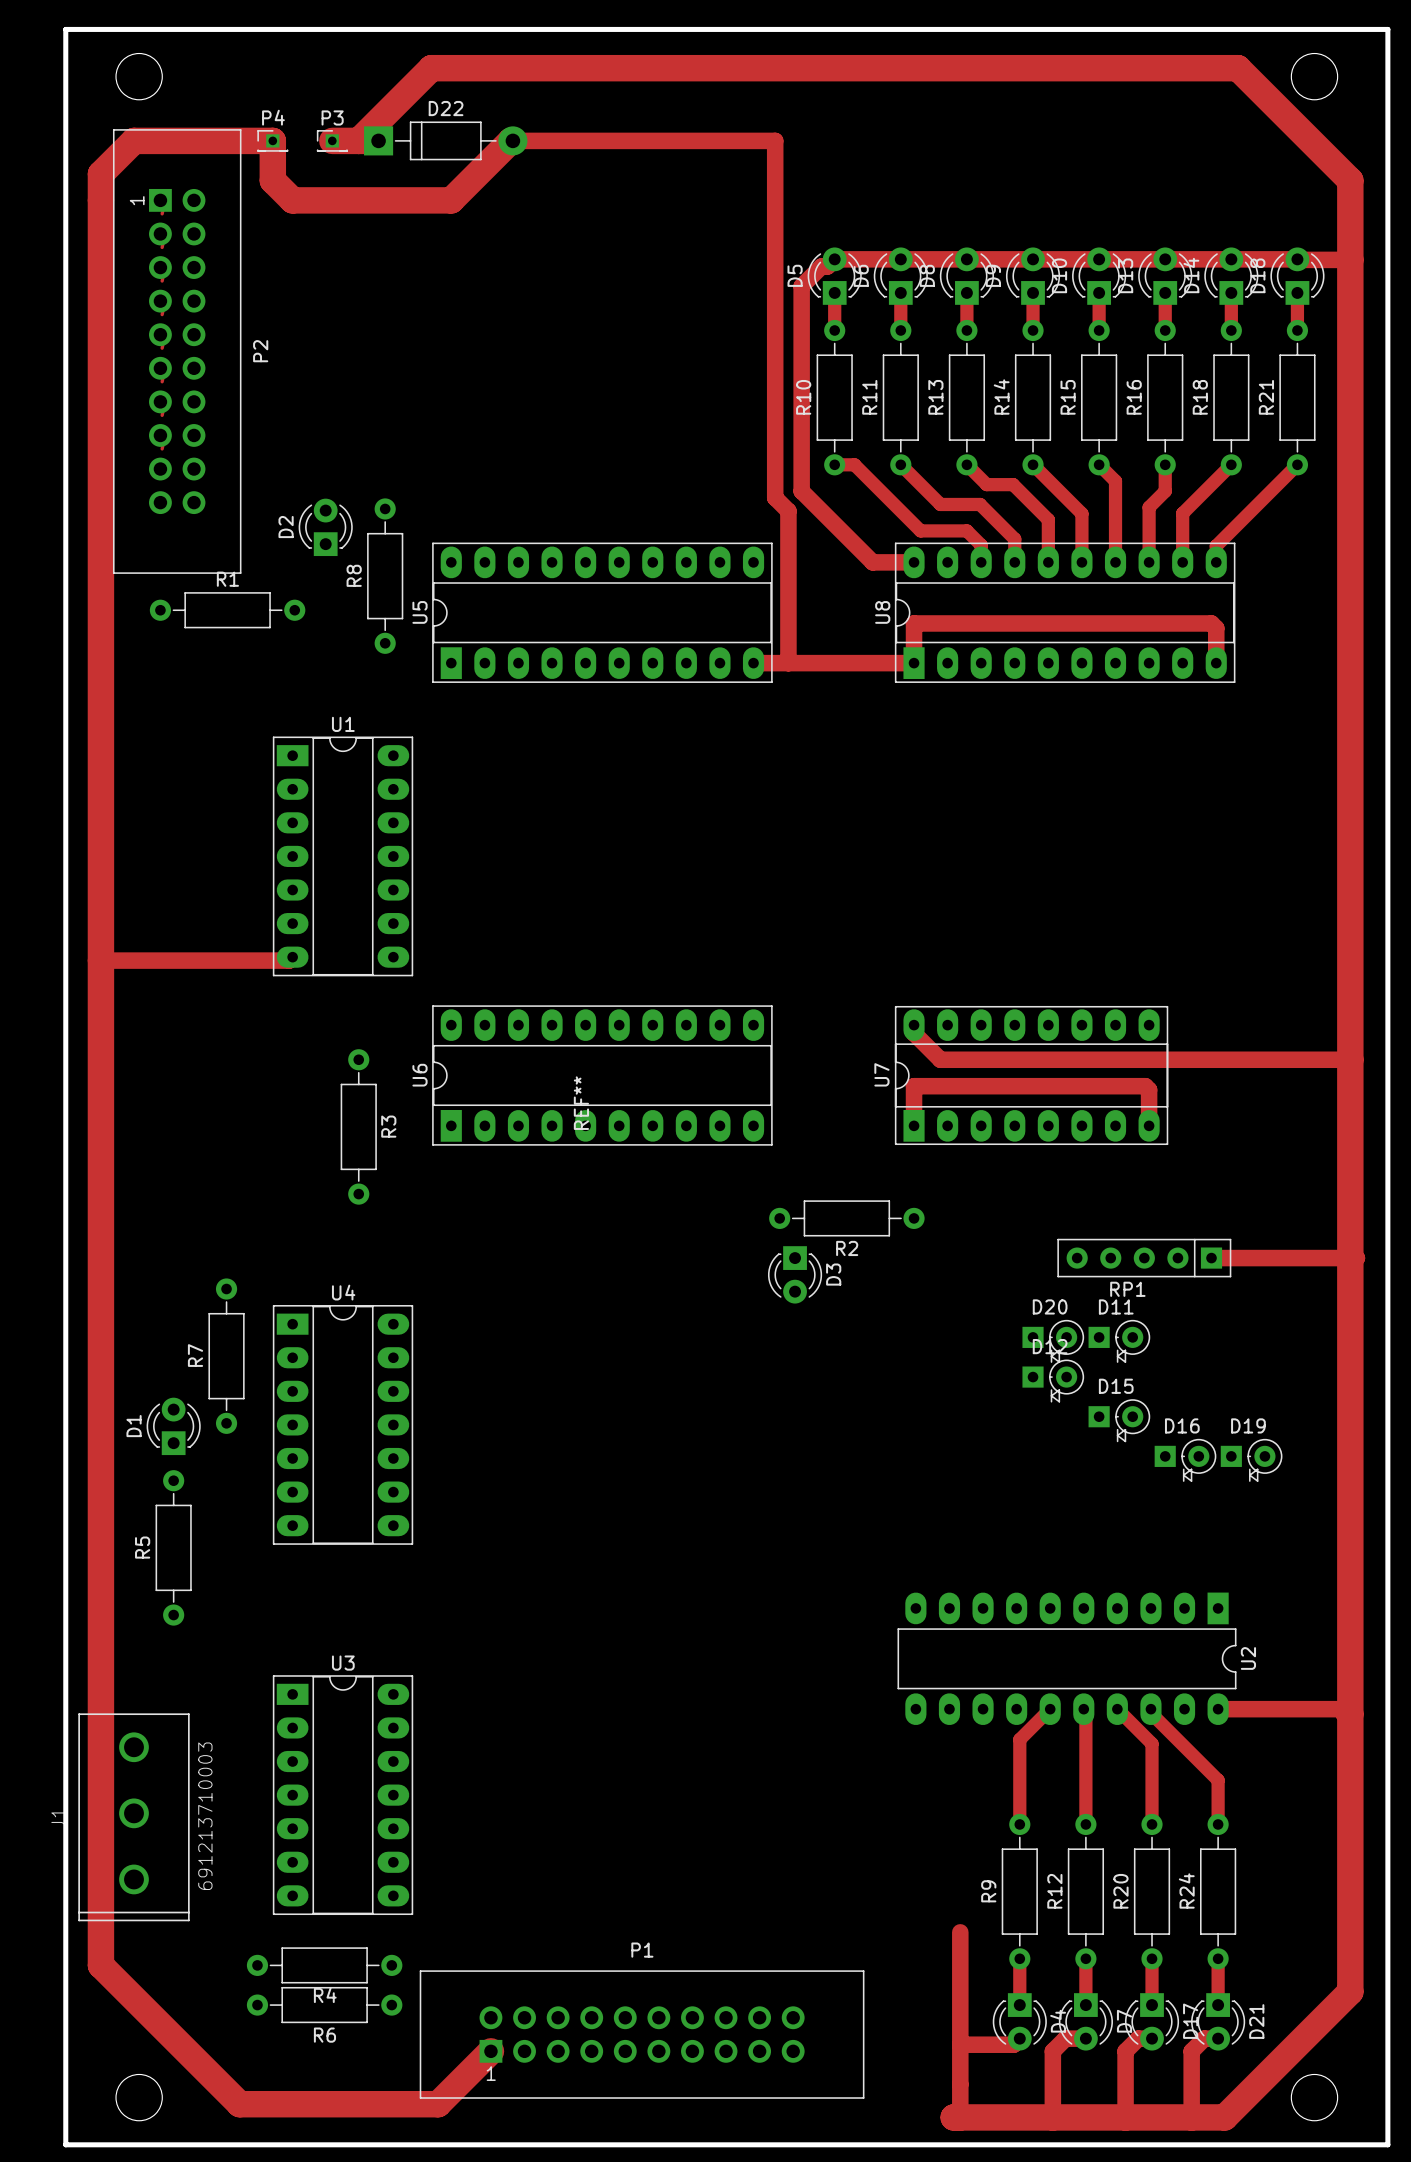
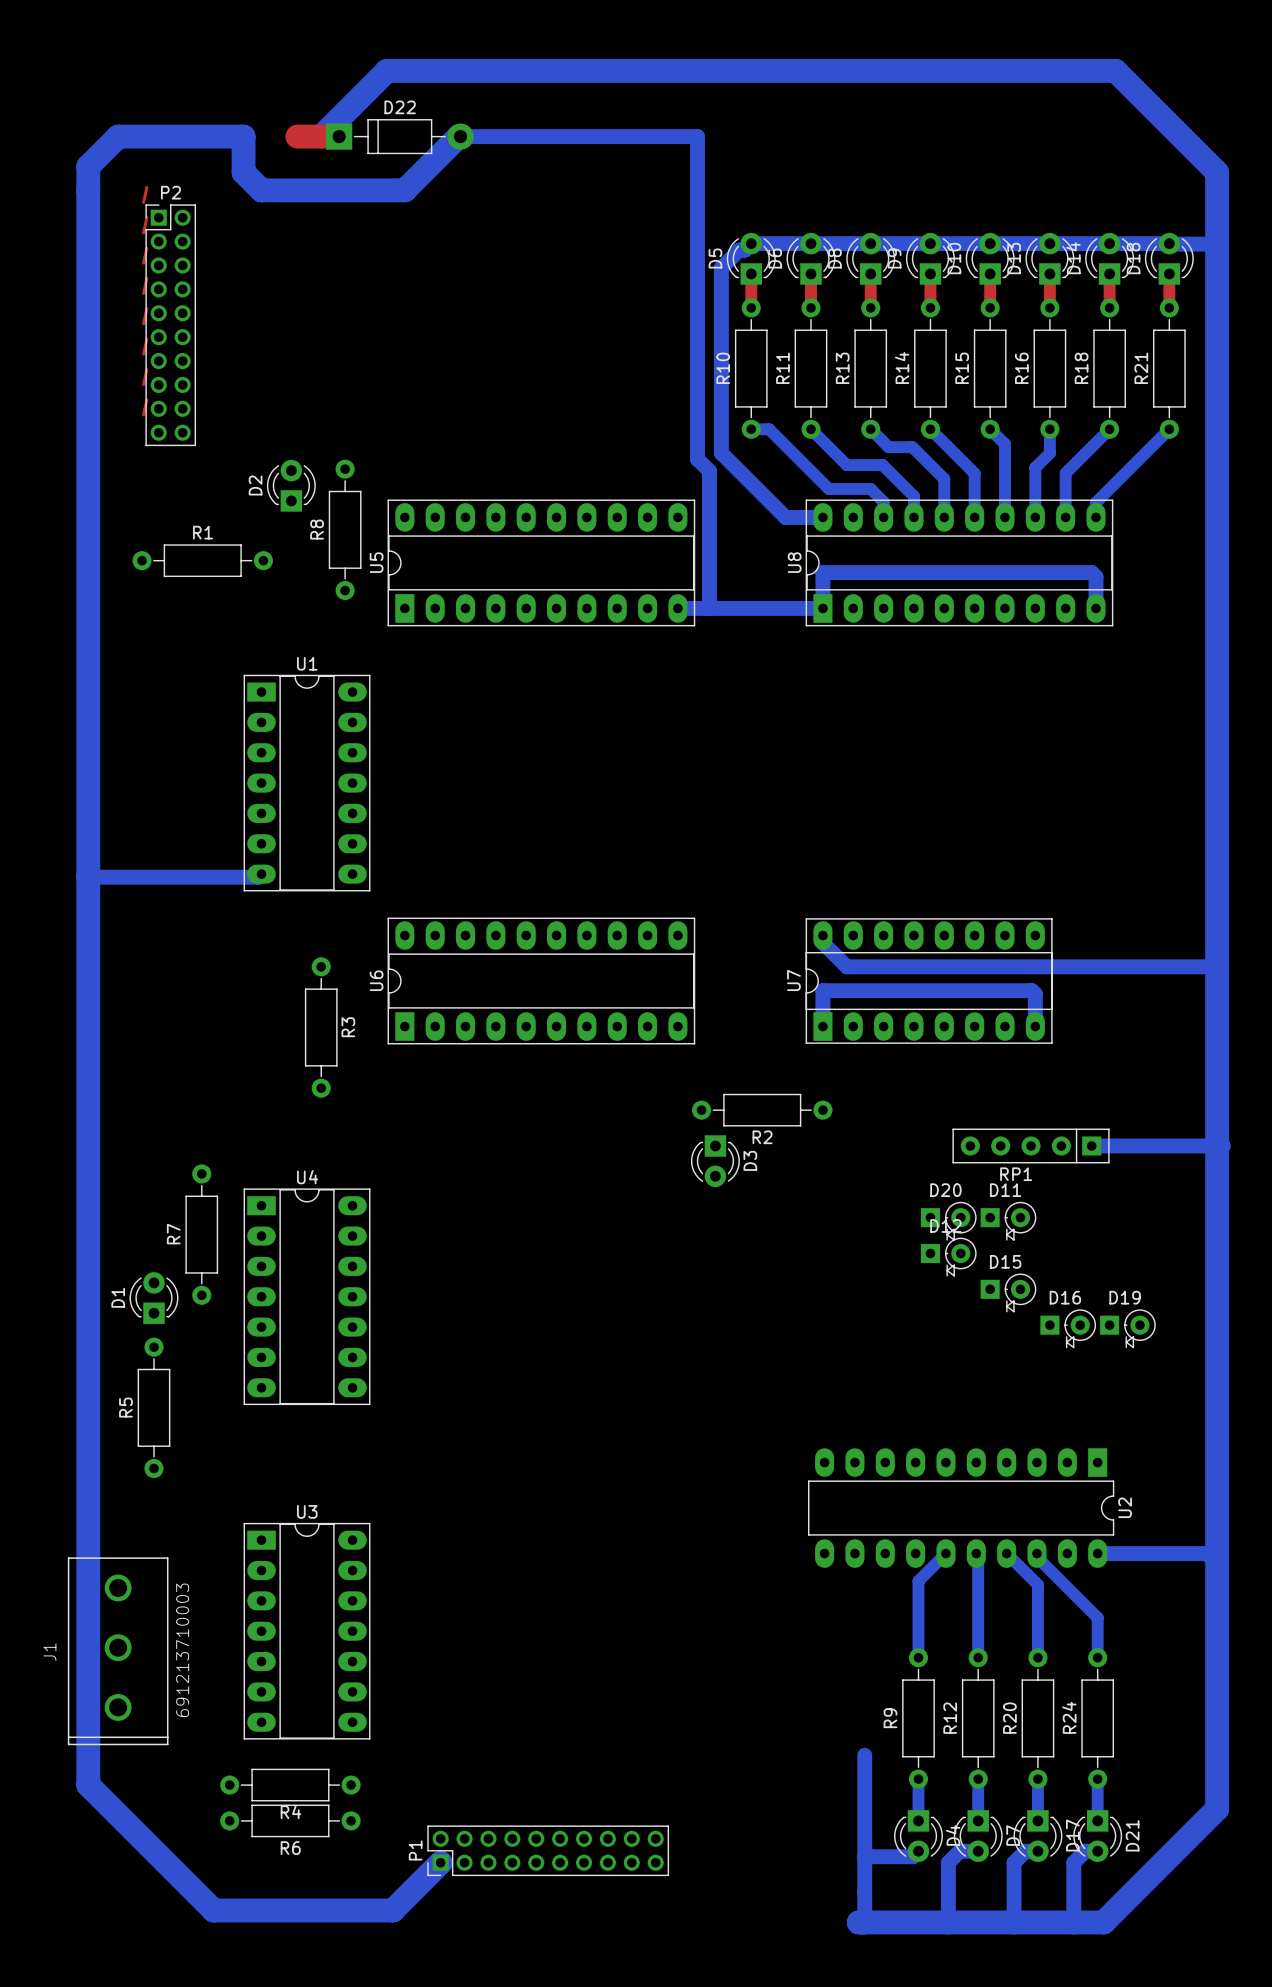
P2 footprint: [112, 129, 242, 574] -> [145, 204, 197, 447]
P4: (272, 140) -> none
P3: (332, 140) -> none
top track: (358, 140) (431, 68) (1237, 68) (1350, 180) (1350, 1991) (1224, 2117) (953, 2117) -> none
bottom track: none -> (321, 136) (386, 70) (1115, 70) (1217, 172) (1217, 1808) (1103, 1922) (858, 1922)
top track: (1350, 259) (834, 259) (827, 266) (821, 266) (801, 286) (801, 491) (872, 562) (914, 562) -> none
bottom track: none -> (1217, 244) (751, 243) (744, 250) (739, 250) (721, 268) (721, 453) (785, 517) (822, 517)
P2 name position: P2 (260, 351) -> P2 (171, 192)
top track: (834, 464) (854, 464) (920, 530) (966, 530) (981, 545) (981, 562) -> none
bottom track: none -> (751, 429) (769, 429) (828, 488) (870, 488) (883, 501) (883, 517)
top track: (900, 464) (940, 504) (980, 504) (1014, 539) (1014, 562) -> none
bottom track: none -> (810, 429) (846, 465) (882, 465) (913, 496) (913, 517)
top track: (966, 464) (986, 484) (1013, 484) (1048, 519) (1048, 562) -> none
bottom track: none -> (870, 429) (888, 447) (912, 447) (944, 478) (944, 517)
top track: (1033, 464) (1081, 513) (1081, 562) -> none
bottom track: none -> (930, 429) (974, 473) (974, 517)
top track: (1099, 464) (1115, 481) (1115, 562) -> none
bottom track: none -> (990, 429) (1004, 444) (1004, 517)
top track: (1165, 464) (1165, 491) (1149, 507) (1149, 562) -> none
bottom track: none -> (1049, 429) (1049, 453) (1035, 467) (1035, 517)
top track: (1231, 464) (1182, 513) (1182, 562) -> none
bottom track: none -> (1109, 429) (1065, 473) (1065, 517)
top track: (1297, 464) (1216, 545) (1216, 562) -> none
bottom track: none -> (1169, 429) (1096, 502) (1096, 517)
top track: (753, 663) (914, 663) (914, 623) (1211, 623) (1216, 628) (1216, 663) -> none
bottom track: none -> (677, 608) (822, 608) (822, 572) (1091, 572) (1096, 576) (1096, 608)
top track: (788, 663) (788, 511) (775, 497) (775, 140) (510, 140) (451, 200) (292, 200) (272, 180) (272, 140) (133, 140) (100, 173) (100, 1965) (239, 2104) (438, 2104) (490, 2051) -> none
bottom track: none -> (709, 608) (709, 471) (697, 459) (697, 136) (458, 136) (404, 190) (261, 190) (243, 172) (243, 136) (118, 136) (88, 166) (88, 1785) (213, 1910) (392, 1910) (440, 1862)
top track: (292, 957) (289, 960) (100, 960) -> none
bottom track: none -> (261, 874) (258, 877) (88, 877)
top track: (914, 1025) (914, 1033) (940, 1059) (1350, 1059) -> none
bottom track: none -> (822, 935) (822, 942) (846, 966) (1217, 966)
REF**: (726, 1087) -> none
top track: (914, 1125) (914, 1086) (1145, 1086) (1149, 1089) (1149, 1125) -> none
bottom track: none -> (822, 1026) (822, 990) (1031, 990) (1035, 994) (1035, 1026)
top track: (1211, 1258) (1356, 1258) -> none
bottom track: none -> (1091, 1145) (1223, 1145)
top track: (1050, 1709) (1019, 1739) (1019, 1824) -> none
bottom track: none -> (945, 1553) (918, 1581) (918, 1657)
top track: (1083, 1709) (1085, 1711) (1085, 1824) -> none
bottom track: none -> (976, 1553) (978, 1555) (978, 1657)
top track: (1117, 1709) (1152, 1743) (1152, 1824) -> none
bottom track: none -> (1006, 1553) (1037, 1584) (1037, 1657)
top track: (1150, 1709) (1150, 1713) (1218, 1780) (1218, 1824) -> none
bottom track: none -> (1037, 1553) (1037, 1557) (1097, 1617) (1097, 1657)
top track: (1218, 1709) (1350, 1709) (1345, 1714) -> none
bottom track: none -> (1097, 1553) (1217, 1553) (1212, 1558)
top track: (960, 1932) (960, 2117) -> none
bottom track: none -> (864, 1755) (864, 1922)
P1 name position: P1 (642, 1950) -> P1 (415, 1850)
top track: (1019, 1958) (1019, 2005) -> none
bottom track: none -> (918, 1779) (918, 1820)
top track: (1085, 1958) (1085, 2005) -> none
bottom track: none -> (978, 1779) (978, 1820)
top track: (1152, 1958) (1152, 2005) -> none
bottom track: none -> (1037, 1779) (1037, 1820)
top track: (1218, 1958) (1218, 2005) -> none
bottom track: none -> (1097, 1779) (1097, 1820)
P1 footprint: [419, 1970, 865, 2099] -> [427, 1825, 670, 1877]
top track: (1019, 2038) (1013, 2044) (960, 2044) -> none
bottom track: none -> (918, 1851) (913, 1856) (864, 1856)
top track: (1085, 2038) (1065, 2038) (1052, 2051) (1052, 2117) -> none
bottom track: none -> (978, 1851) (959, 1851) (948, 1862) (948, 1922)
top track: (1152, 2038) (1138, 2038) (1125, 2051) (1125, 2117) -> none
bottom track: none -> (1037, 1851) (1025, 1851) (1014, 1862) (1014, 1922)
top track: (1218, 2038) (1204, 2038) (1191, 2051) (1191, 2117) -> none
bottom track: none -> (1097, 1851) (1085, 1851) (1073, 1862) (1073, 1922)

